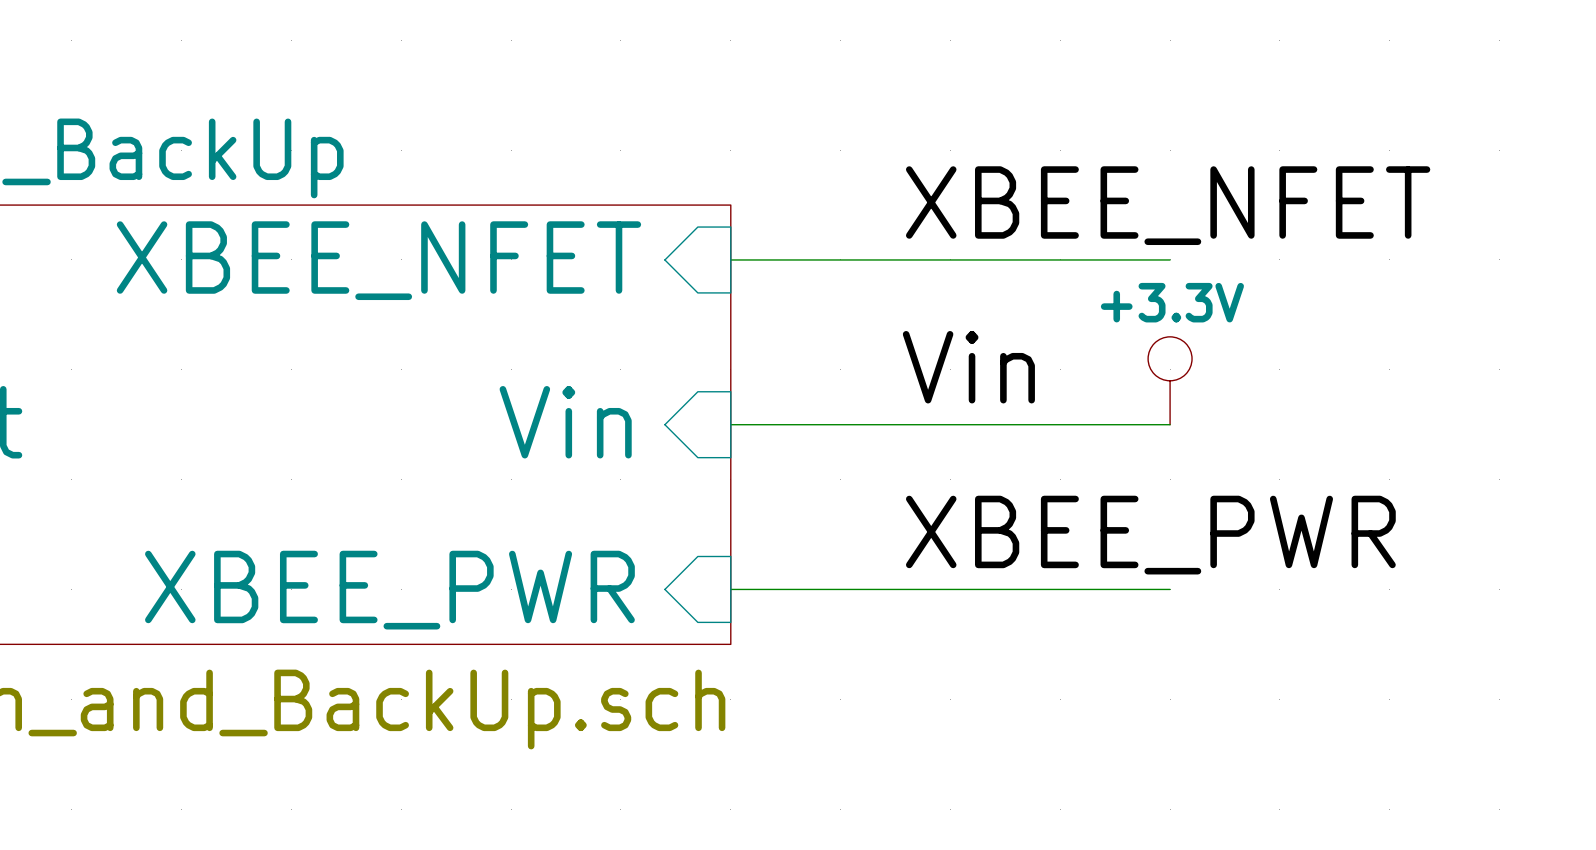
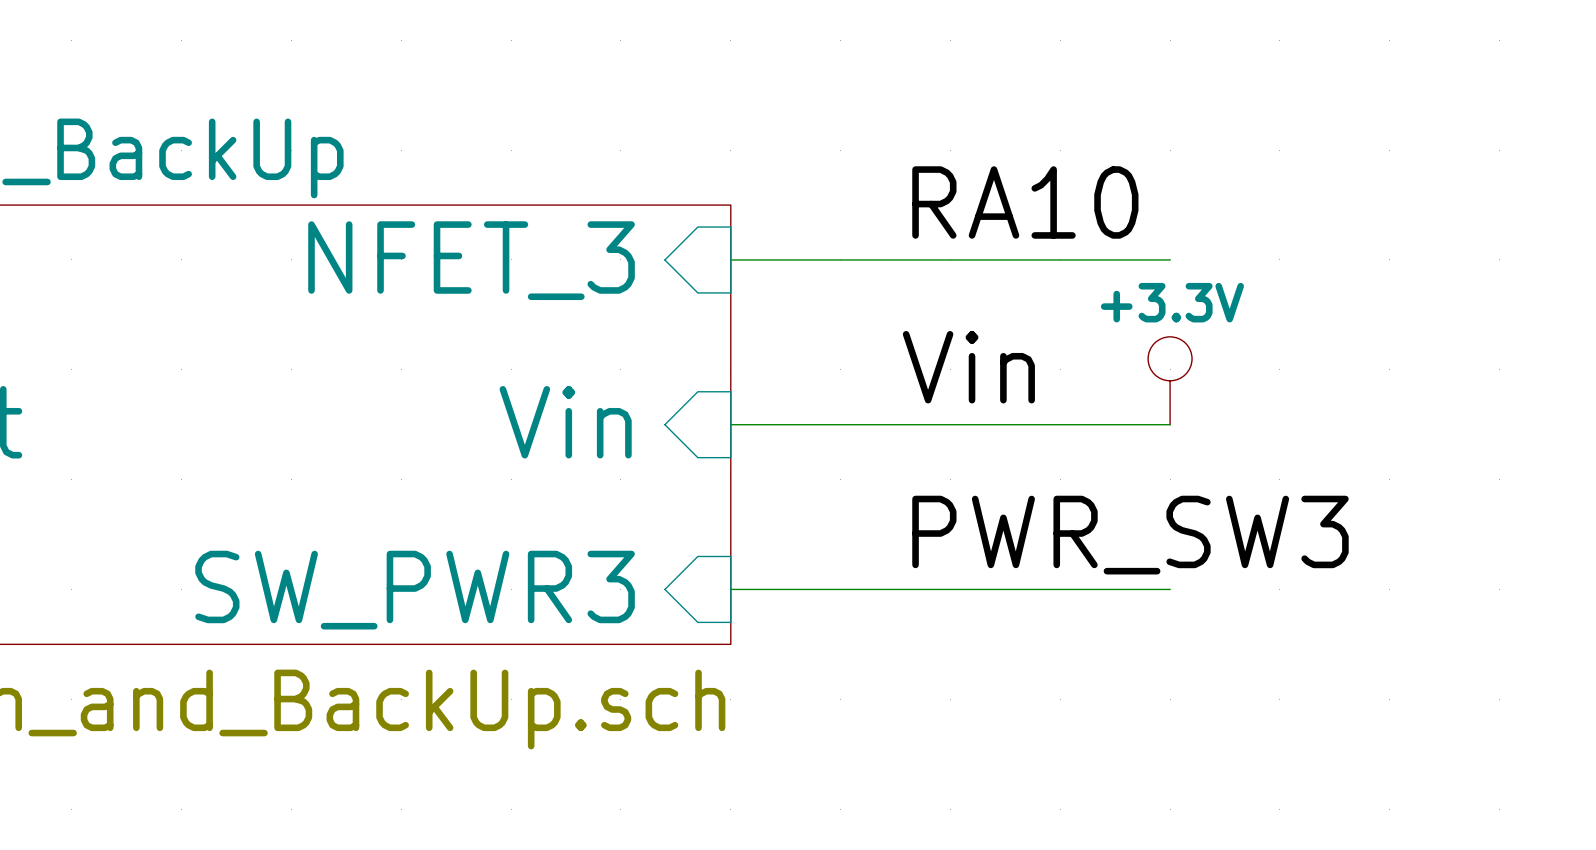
label: XBEE_NFET (1168, 205) -> RA10 (1025, 202)
sheet pin: XBEE_NFET (378, 260) -> NFET_3 (471, 260)
label: XBEE_PWR (1150, 535) -> PWR_SW3 (1130, 535)
sheet pin: XBEE_PWR (389, 590) -> SW_PWR3 (415, 590)

